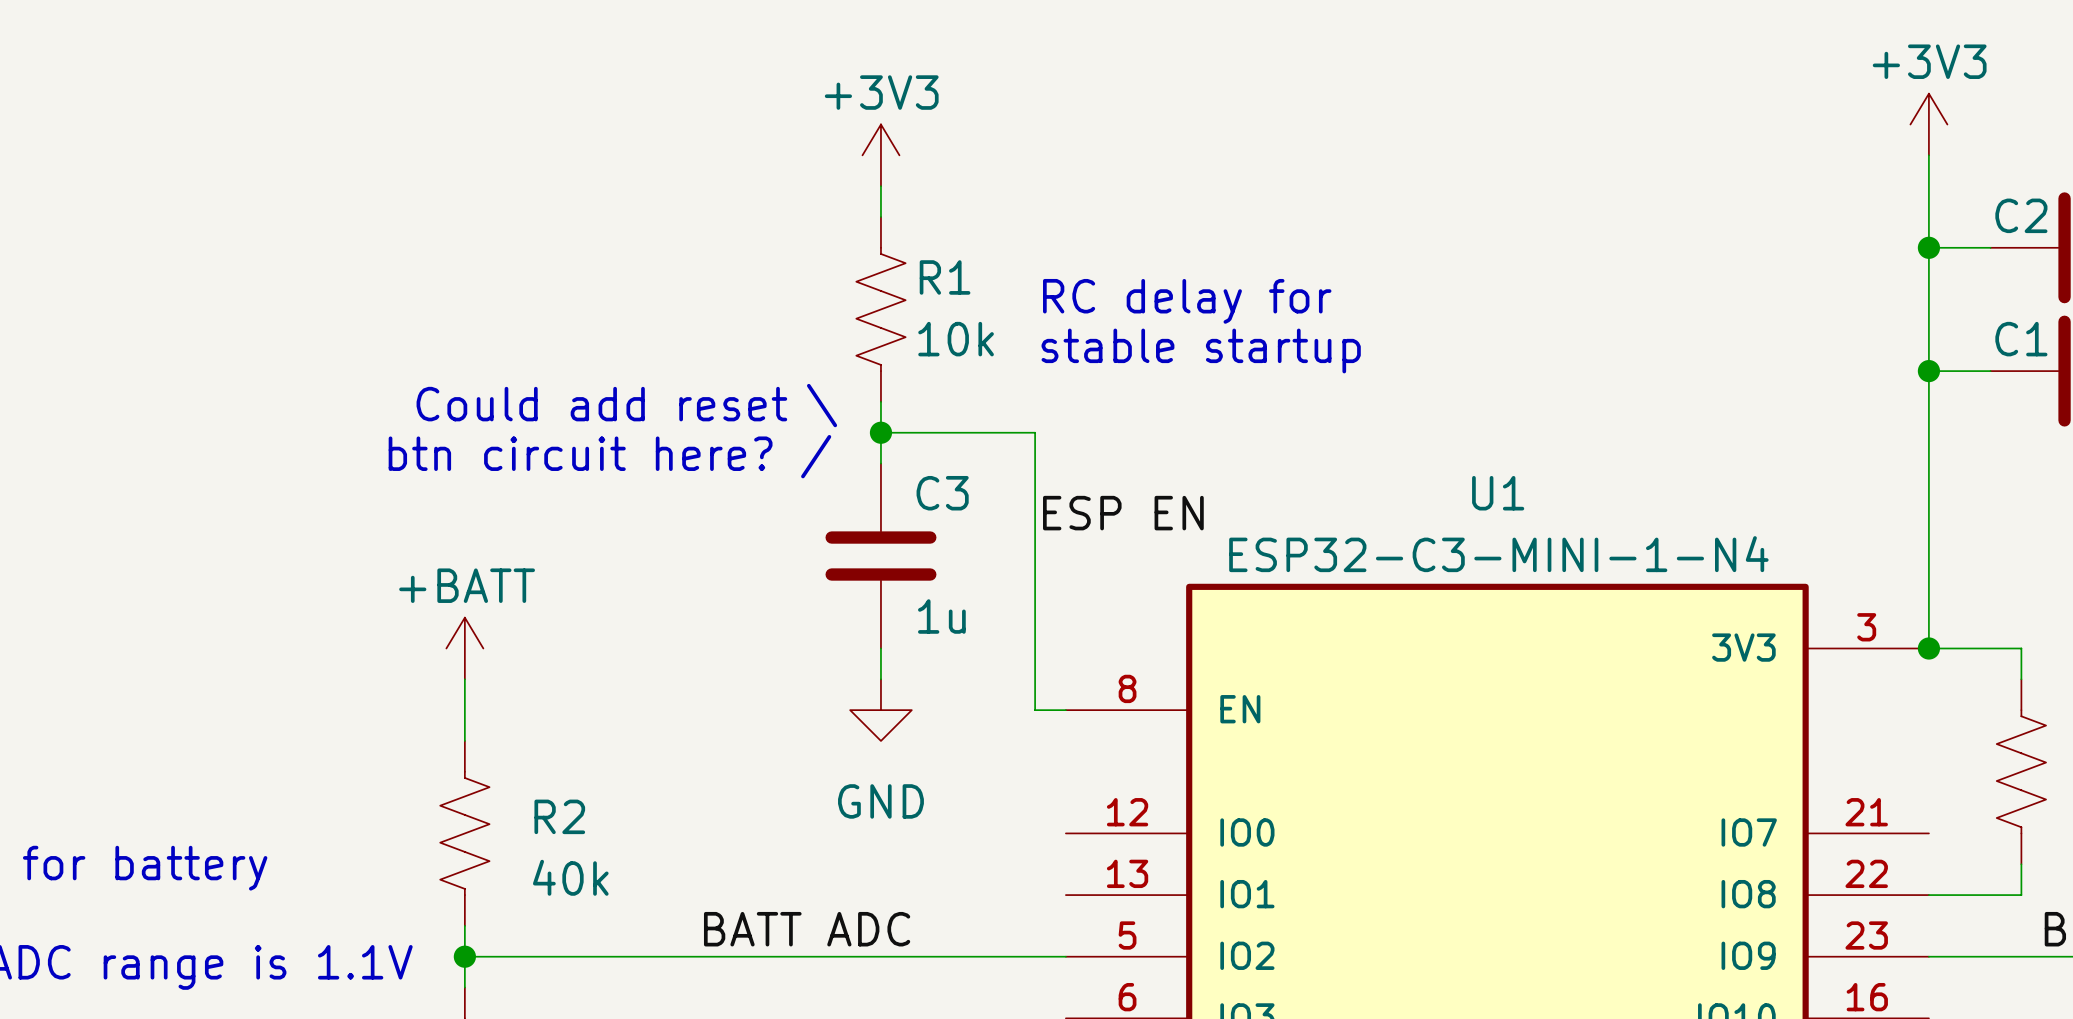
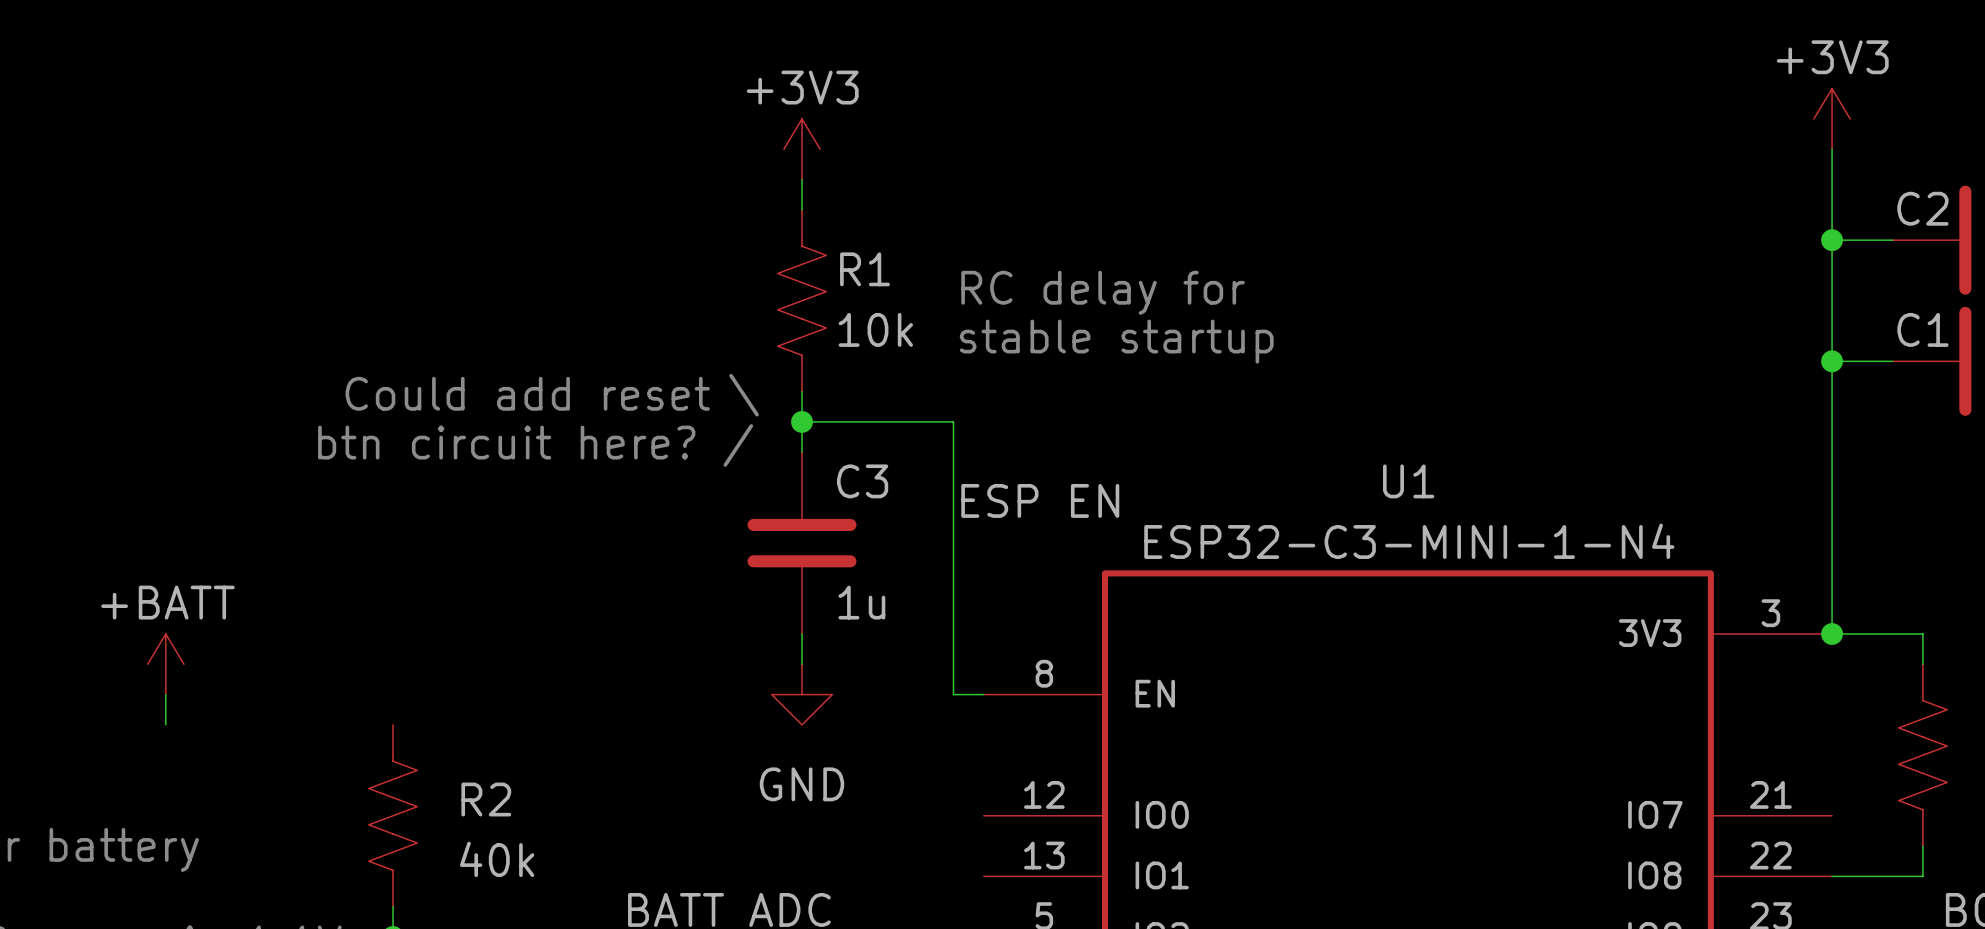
power symbol position: +BATT (464, 648) -> +BATT (165, 664)
wire: (464, 679) (464, 740) -> none
wire: none -> (165, 694) (165, 724)

